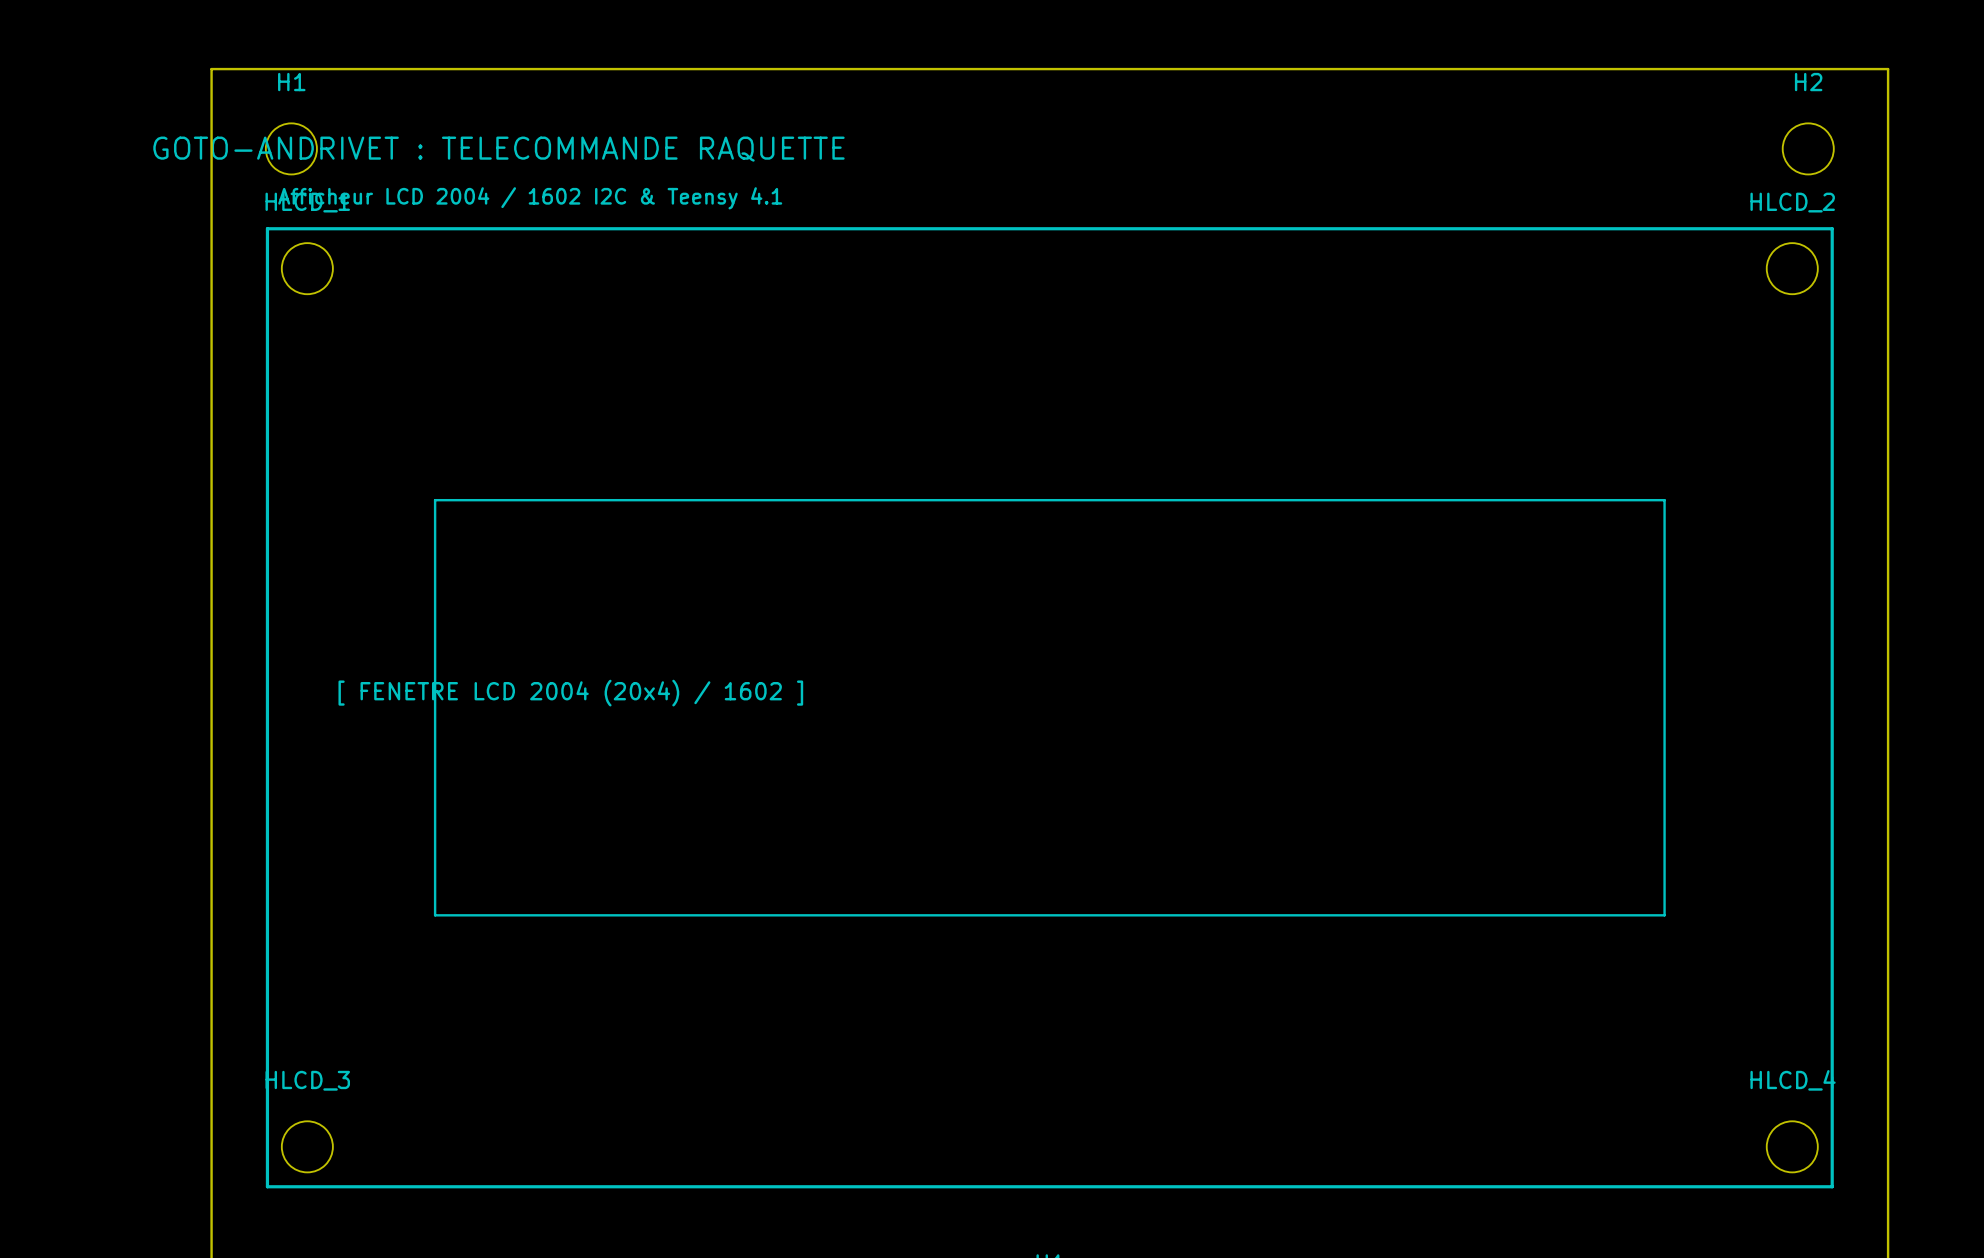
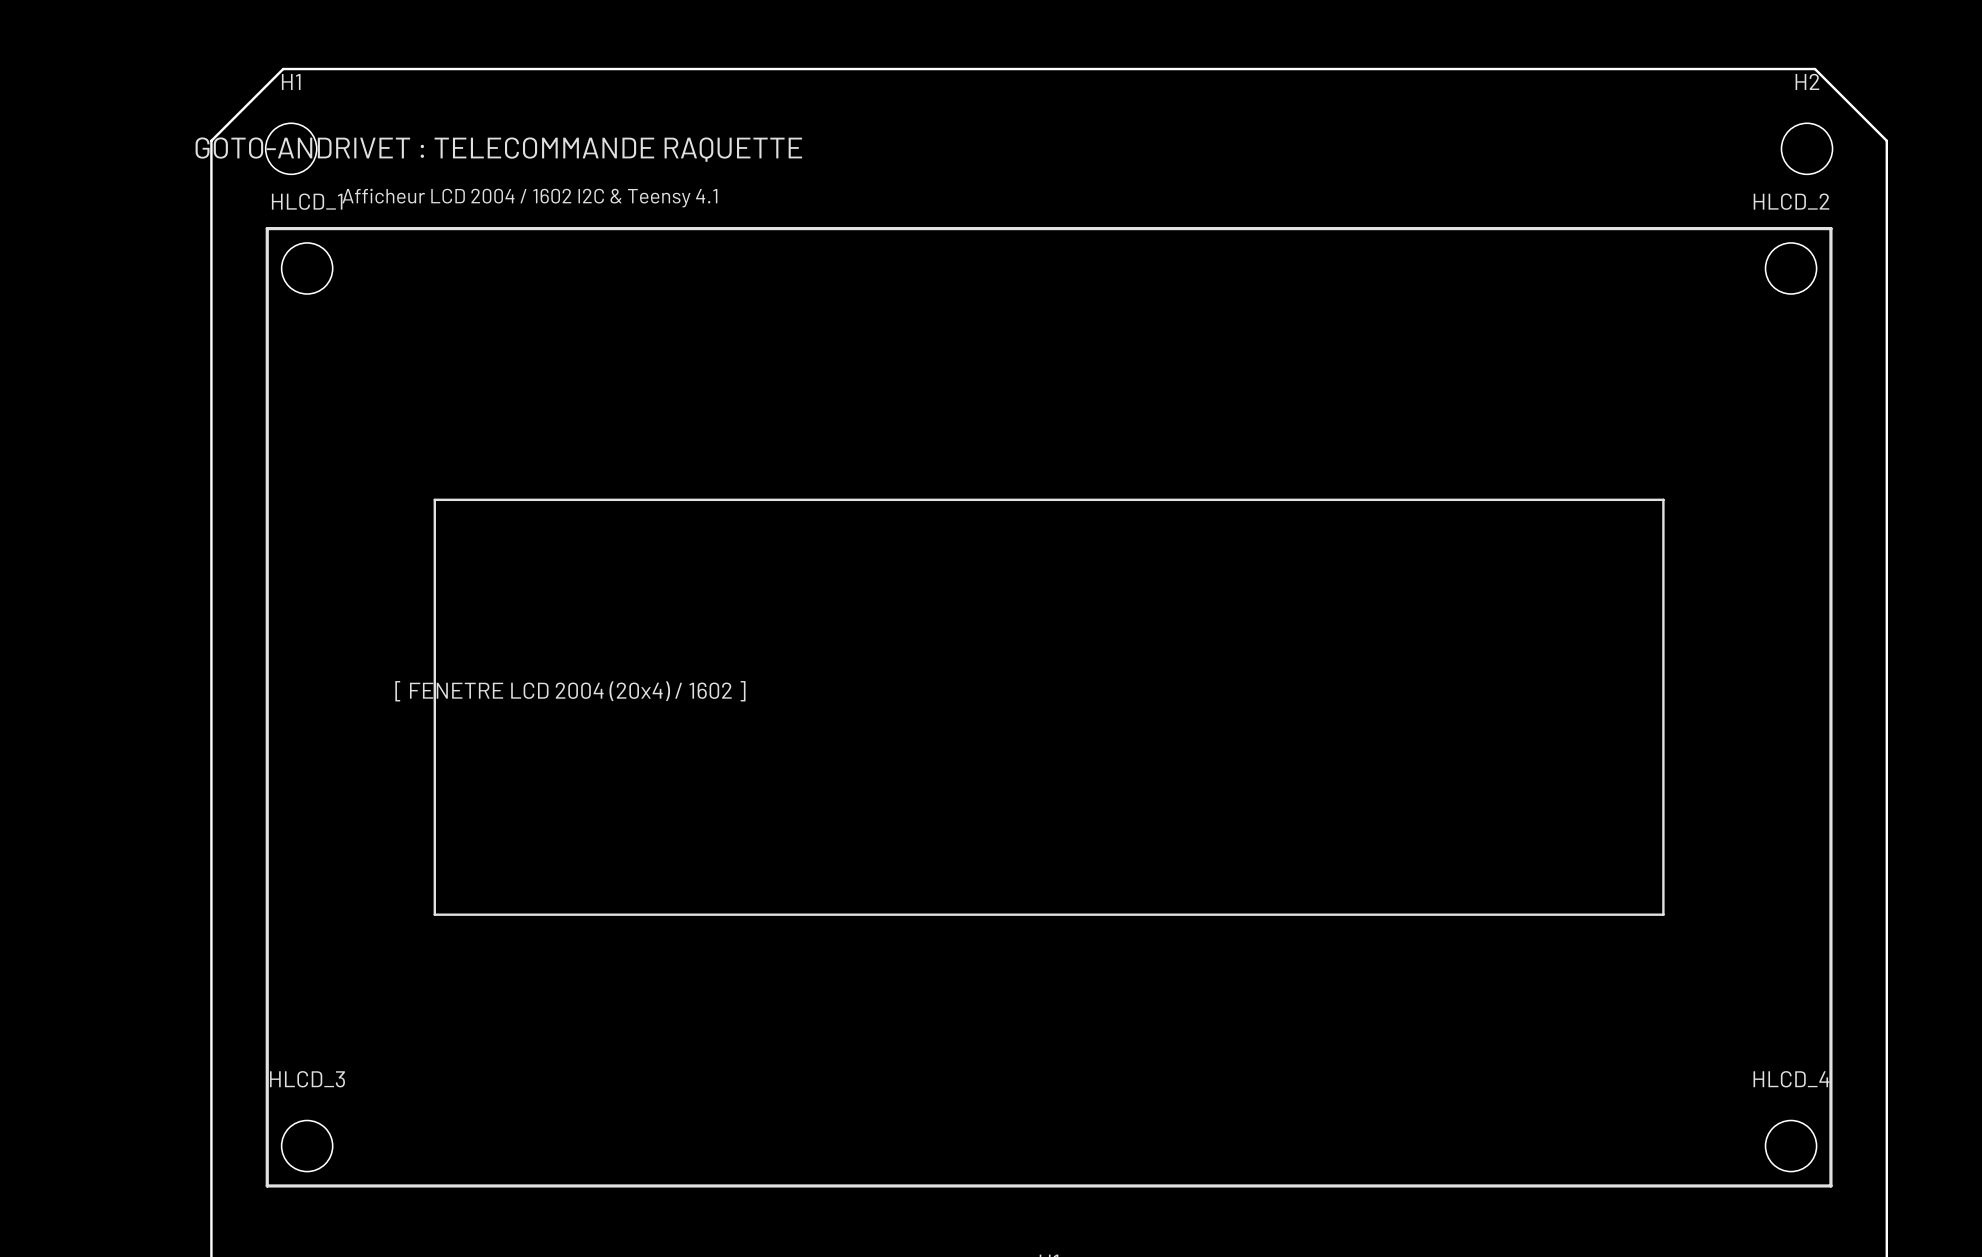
board edge: (283, 69) (211, 69) (211, 140) -> (283, 69) (211, 140)
board edge: (1816, 69) (1888, 69) (1888, 140) -> (1814, 69) (1886, 140)

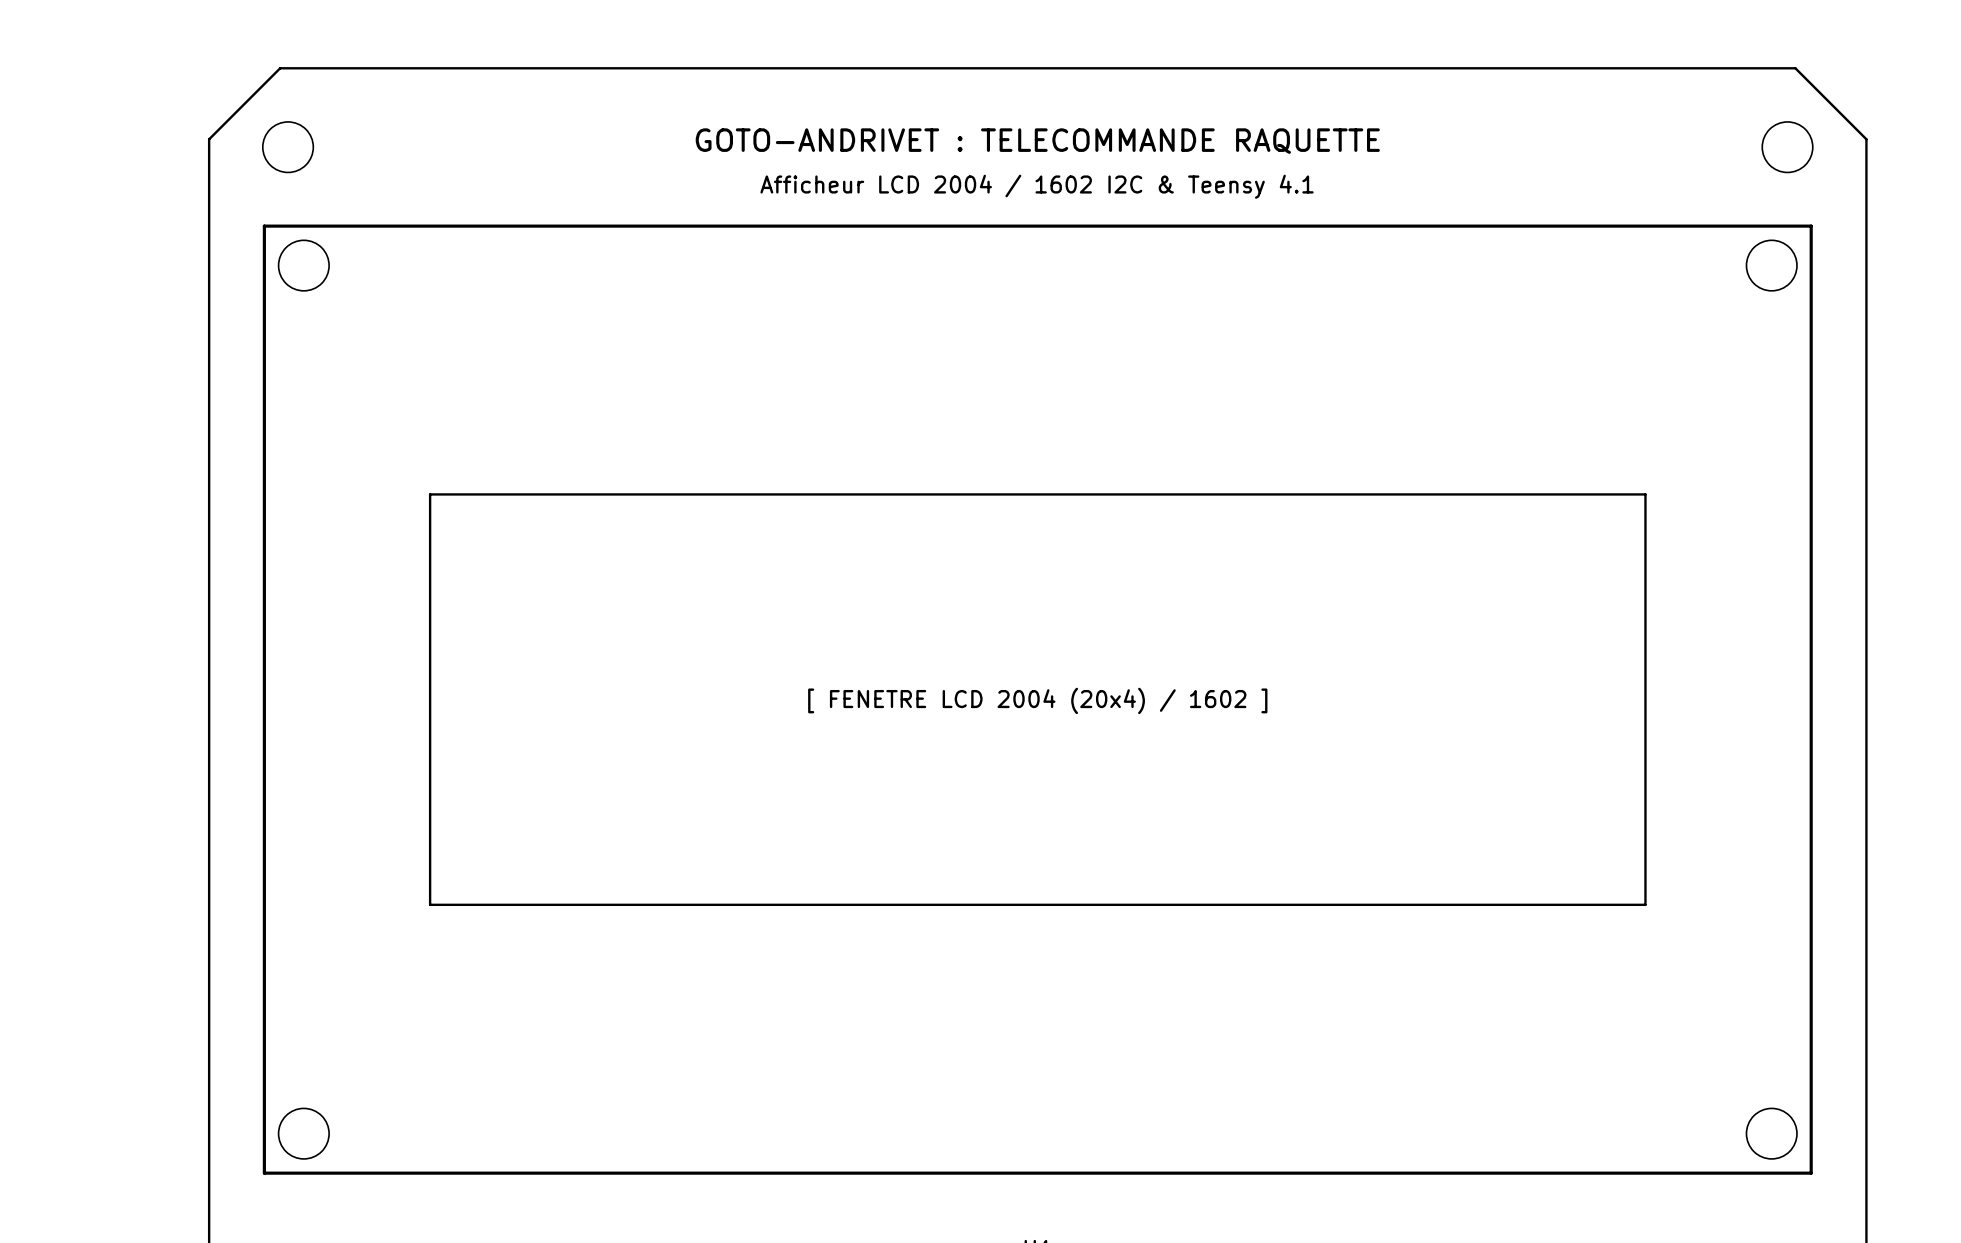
H1 name: H1 (291, 81) -> none
H2 name: H2 (1807, 81) -> none
text: none -> GOTO-ANDRIVET : TELECOMMANDE RAQUETTE (1037, 141)
text: GOTO-ANDRIVET : TELECOMMANDE RAQUETTE (498, 149) -> none
text: none -> Afficheur LCD 2004 / 1602 I2C & Teensy 4.1 (1037, 186)
text: Afficheur LCD 2004 / 1602 I2C & Teensy 4.1 (529, 198) -> none
HLCD_1 name: HLCD_1 (307, 201) -> none
HLCD_2 name: HLCD_2 (1791, 201) -> none
text: [ FENETRE LCD 2004 (20x4) / 1602 ] (570, 691) -> none
text: none -> [ FENETRE LCD 2004 (20x4) / 1602 ] (1037, 700)
HLCD_3 name: HLCD_3 (307, 1079) -> none
HLCD_4 name: HLCD_4 (1791, 1079) -> none

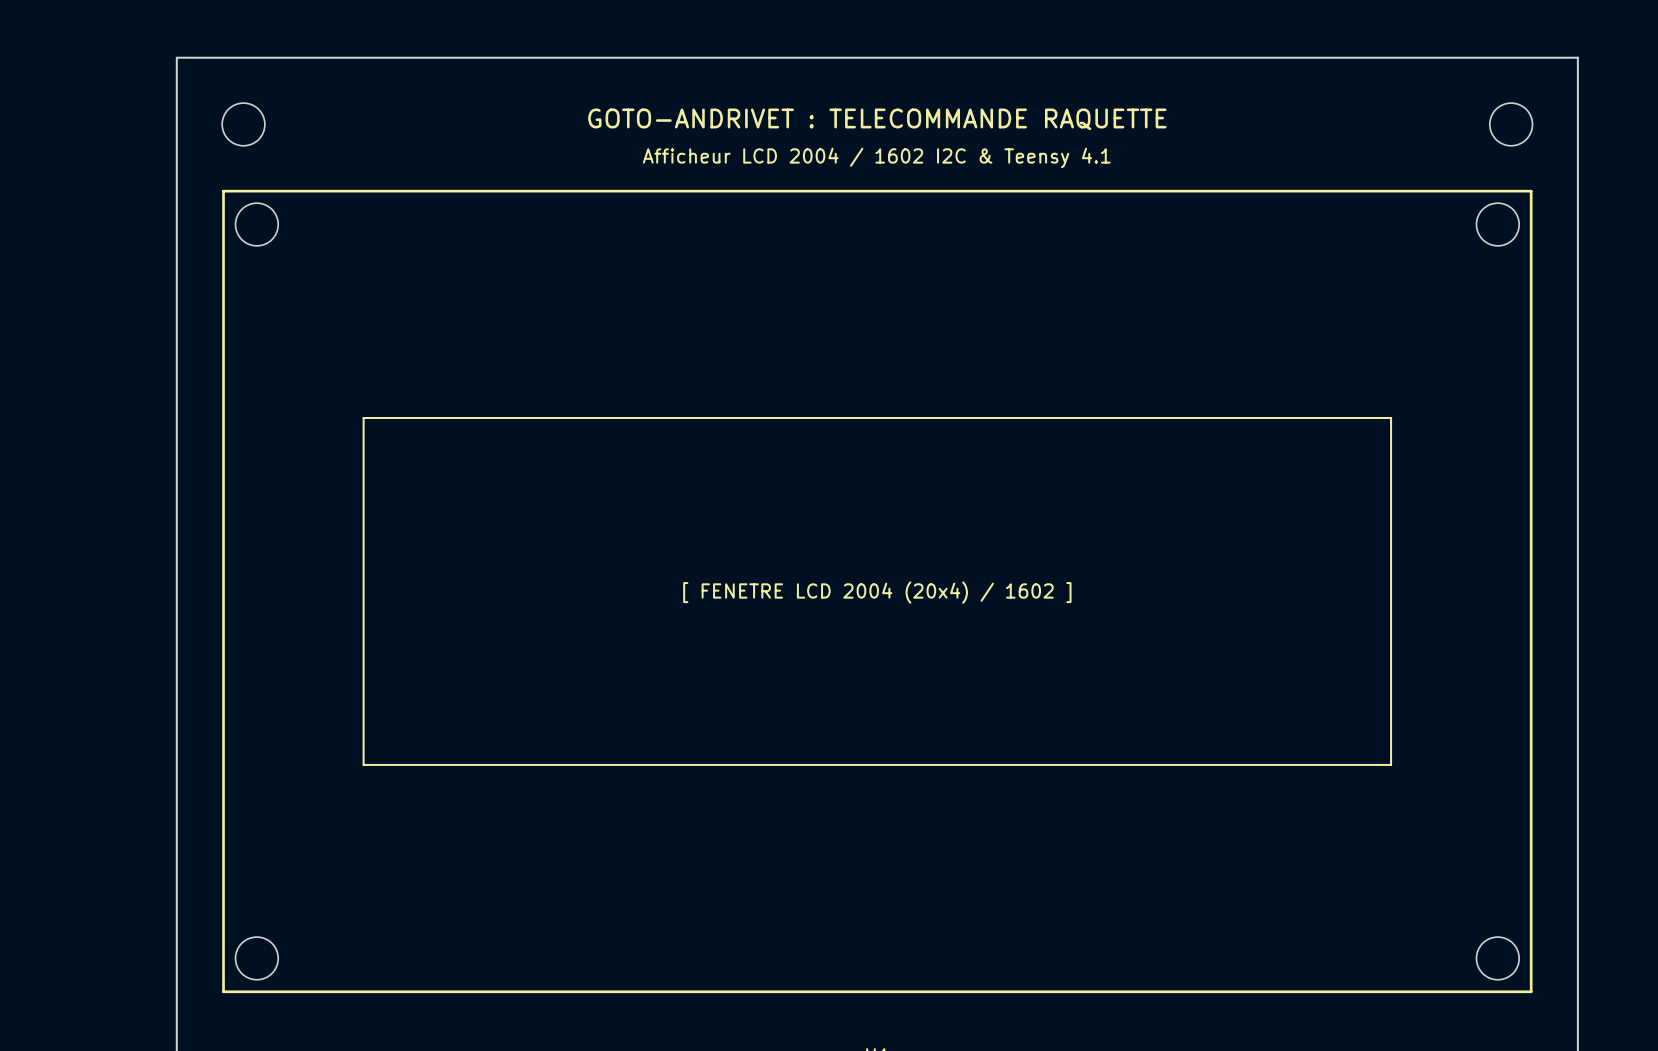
board edge: (280, 68) (209, 139) -> (236, 57) (176, 57) (176, 117)
board edge: (1795, 68) (1866, 139) -> (1517, 57) (1577, 57) (1577, 117)

